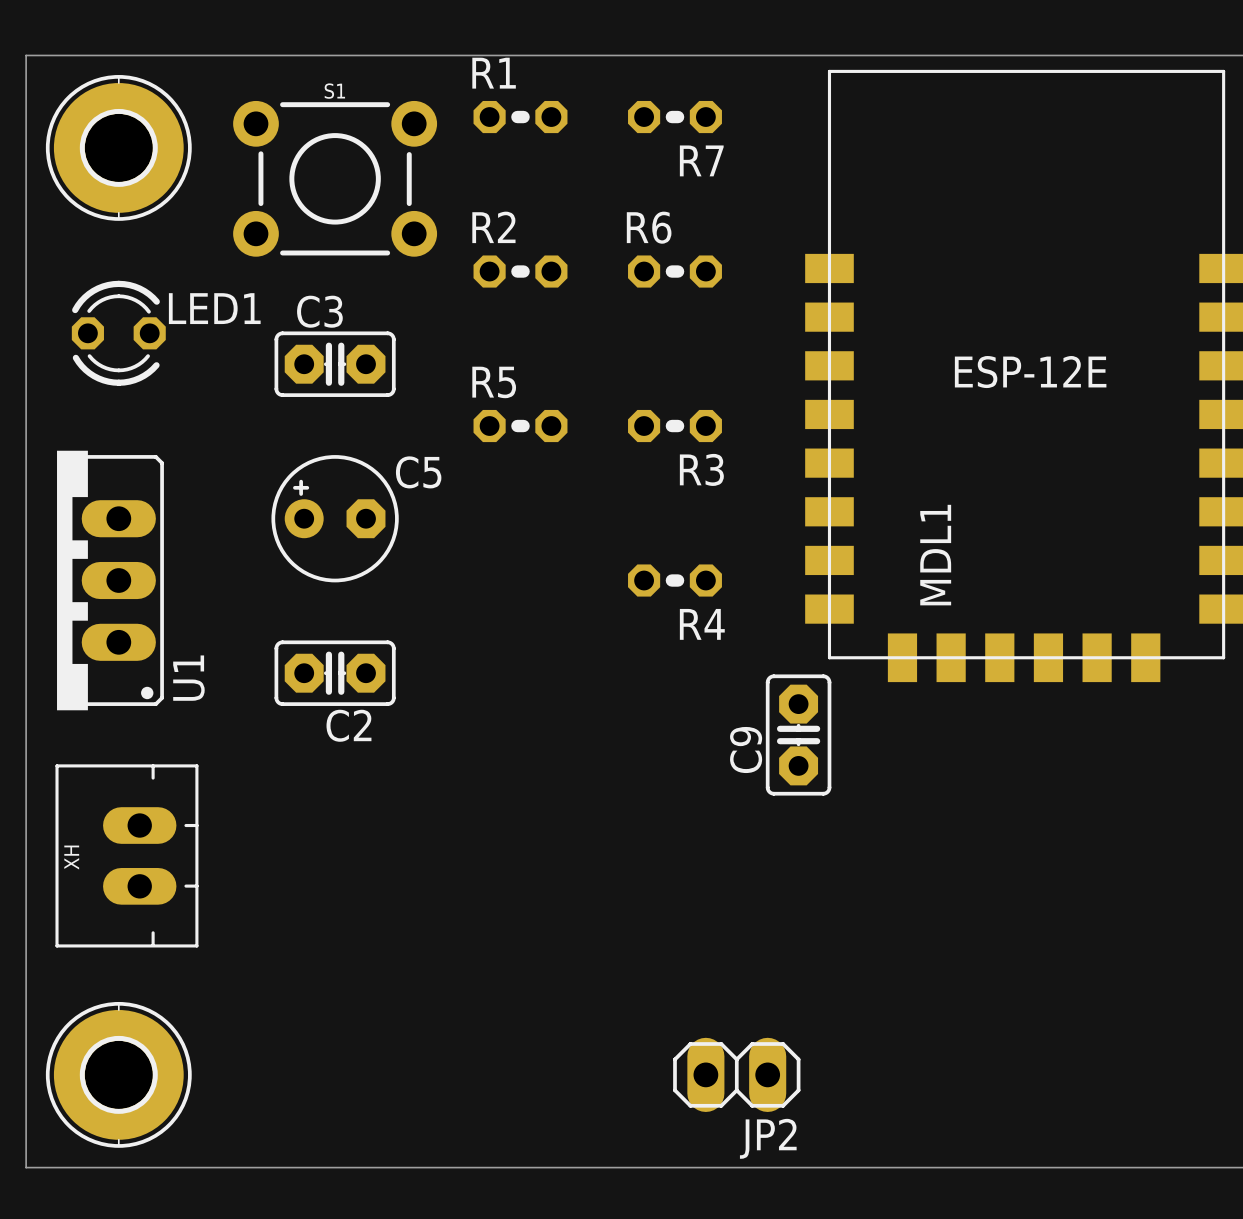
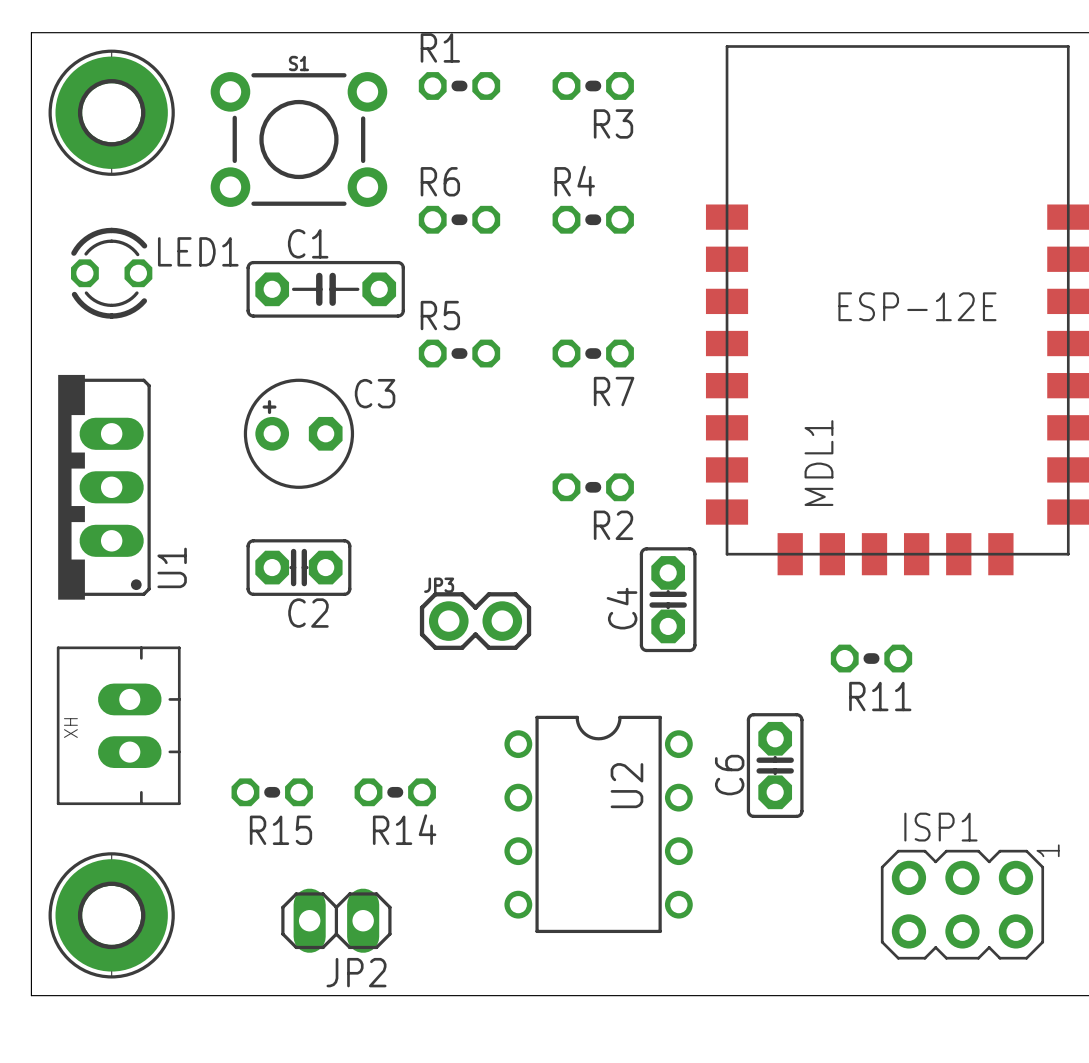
R7 name: R7 (701, 160) -> R3 (613, 123)
R2 name: R2 (493, 227) -> R6 (440, 181)
R6 name: R6 (649, 227) -> R4 (574, 181)
C1: none -> (325, 289)
C3: (335, 364) -> none
R3 name: R3 (701, 469) -> R7 (614, 391)
C5 name: C5 (418, 472) -> C3 (375, 393)
R4 name: R4 (702, 624) -> R2 (613, 525)
C4: none -> (668, 599)
JP3: none -> (475, 621)
C9: (798, 735) -> none
R11: none -> (871, 658)
C6: none -> (775, 765)
R15: none -> (272, 792)
R14: none -> (395, 792)
U2: none -> (598, 824)
ISP1: none -> (962, 904)
JP2 position: (736, 1074) -> (336, 920)

